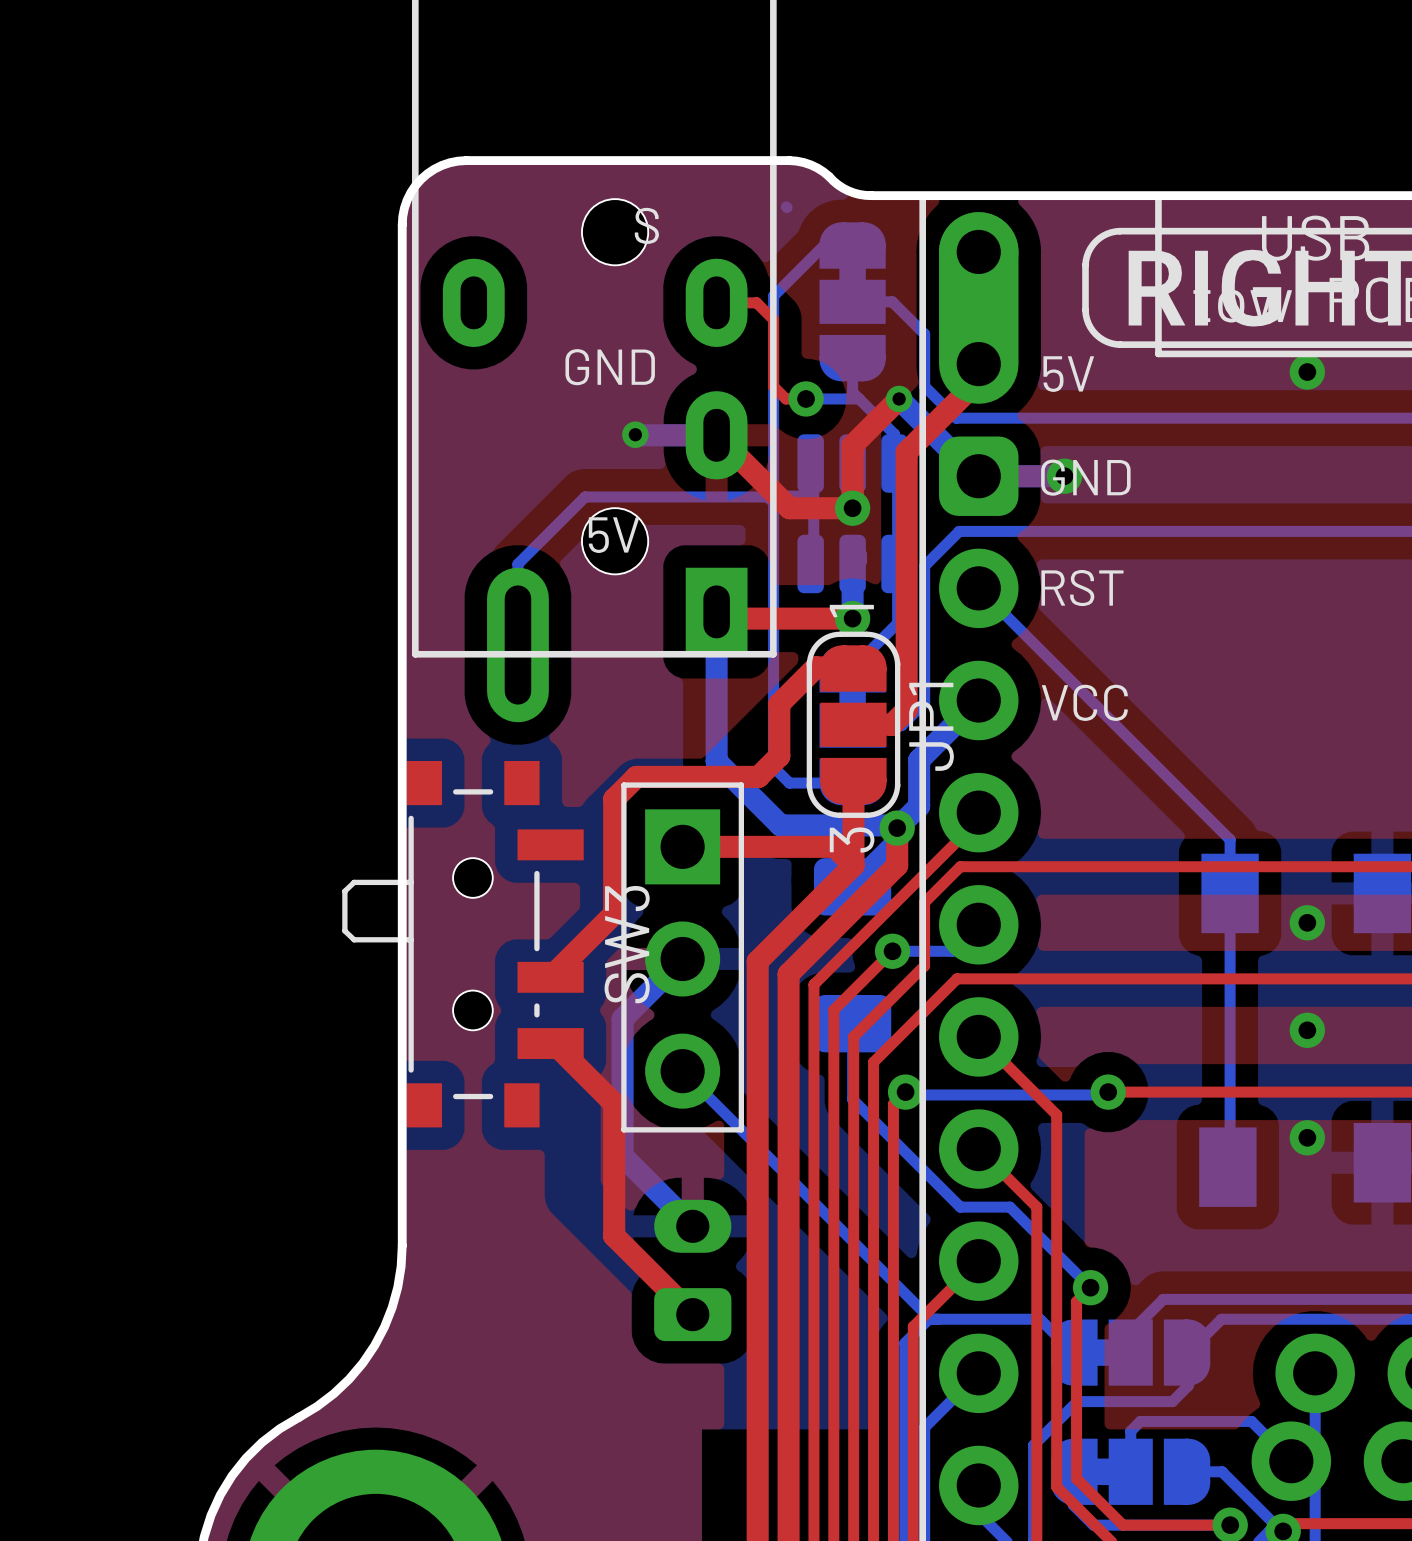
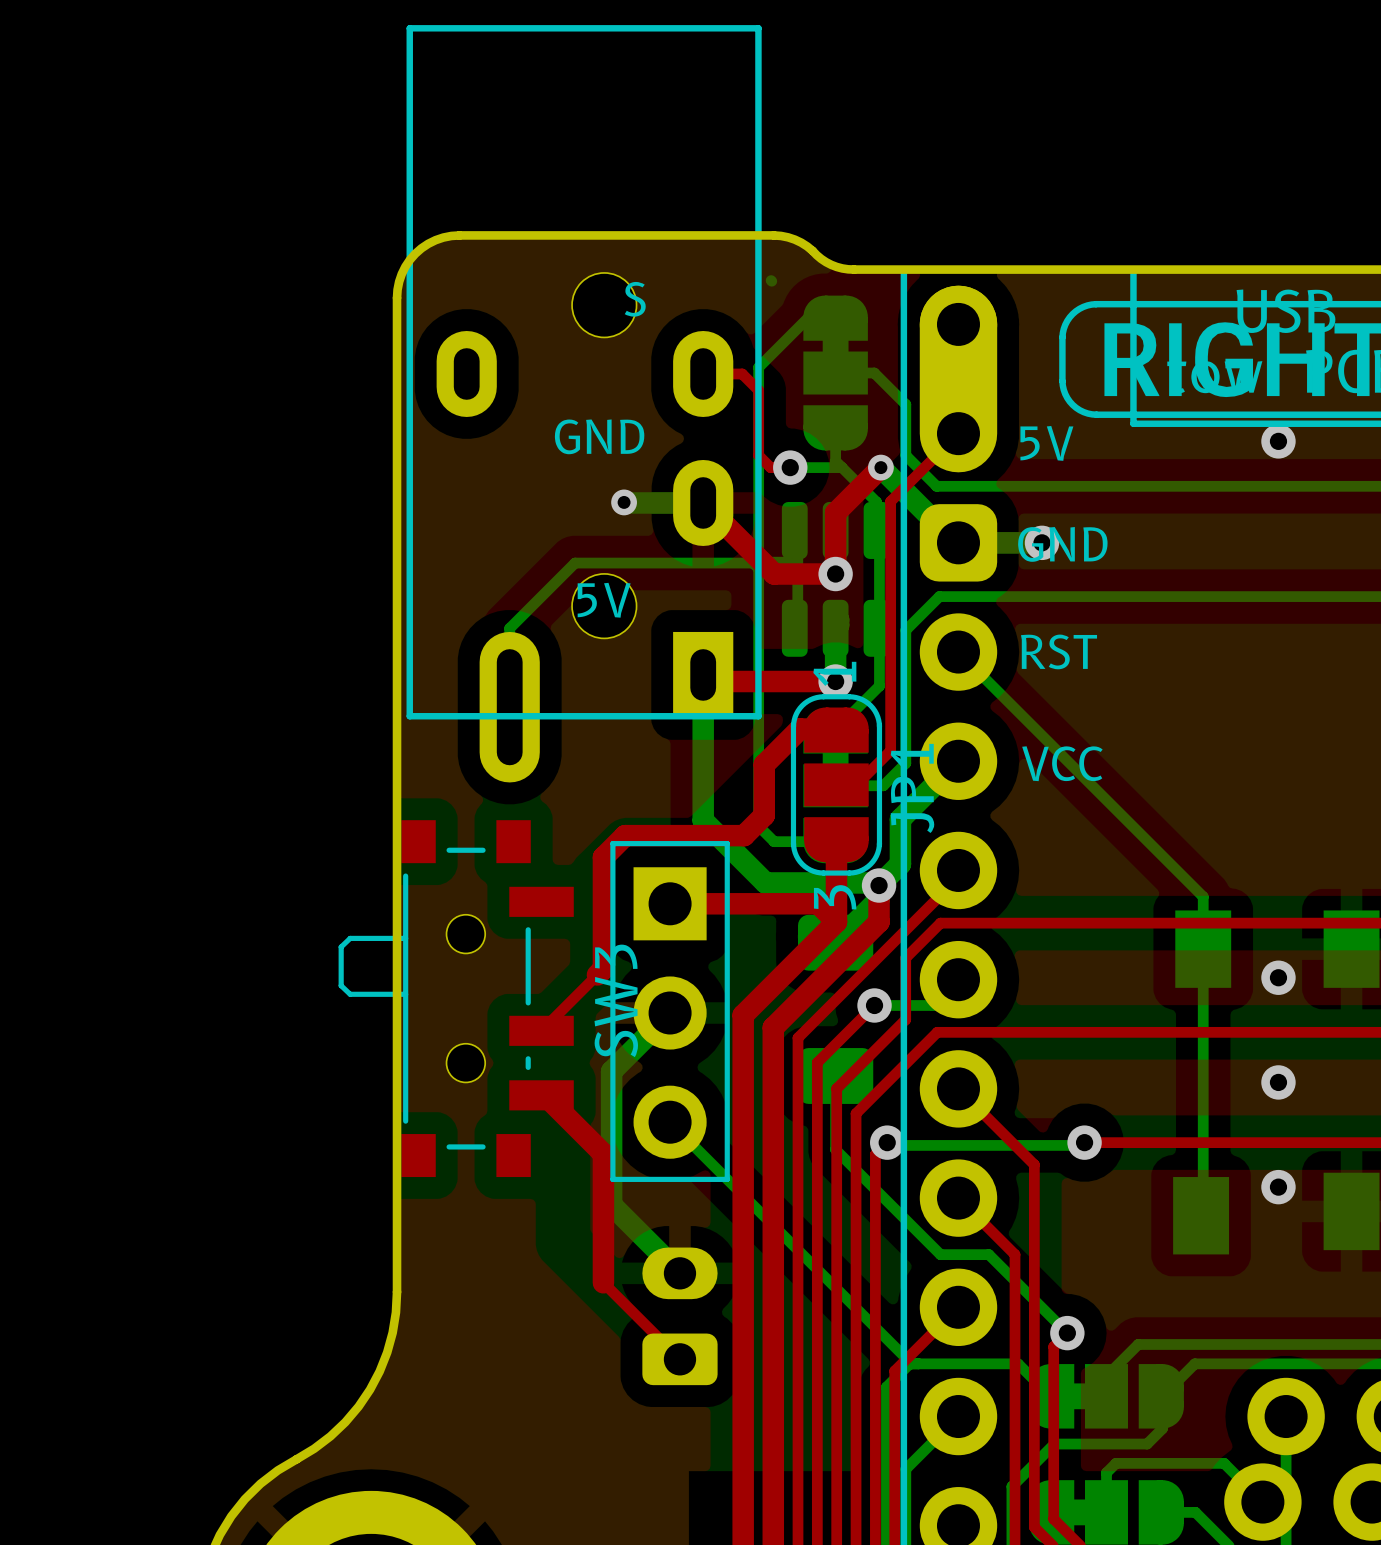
top track: (978, 364) (978, 379) (906, 452) (906, 710) (891, 724) (853, 724) -> (958, 433) (890, 501) (890, 750) (856, 784)
top track width: thick (608, 919) (550, 977) -> thin (597, 974) (541, 1030)
top track width: thick (614, 1236) (692, 1314) -> thin (603, 1282) (679, 1359)

